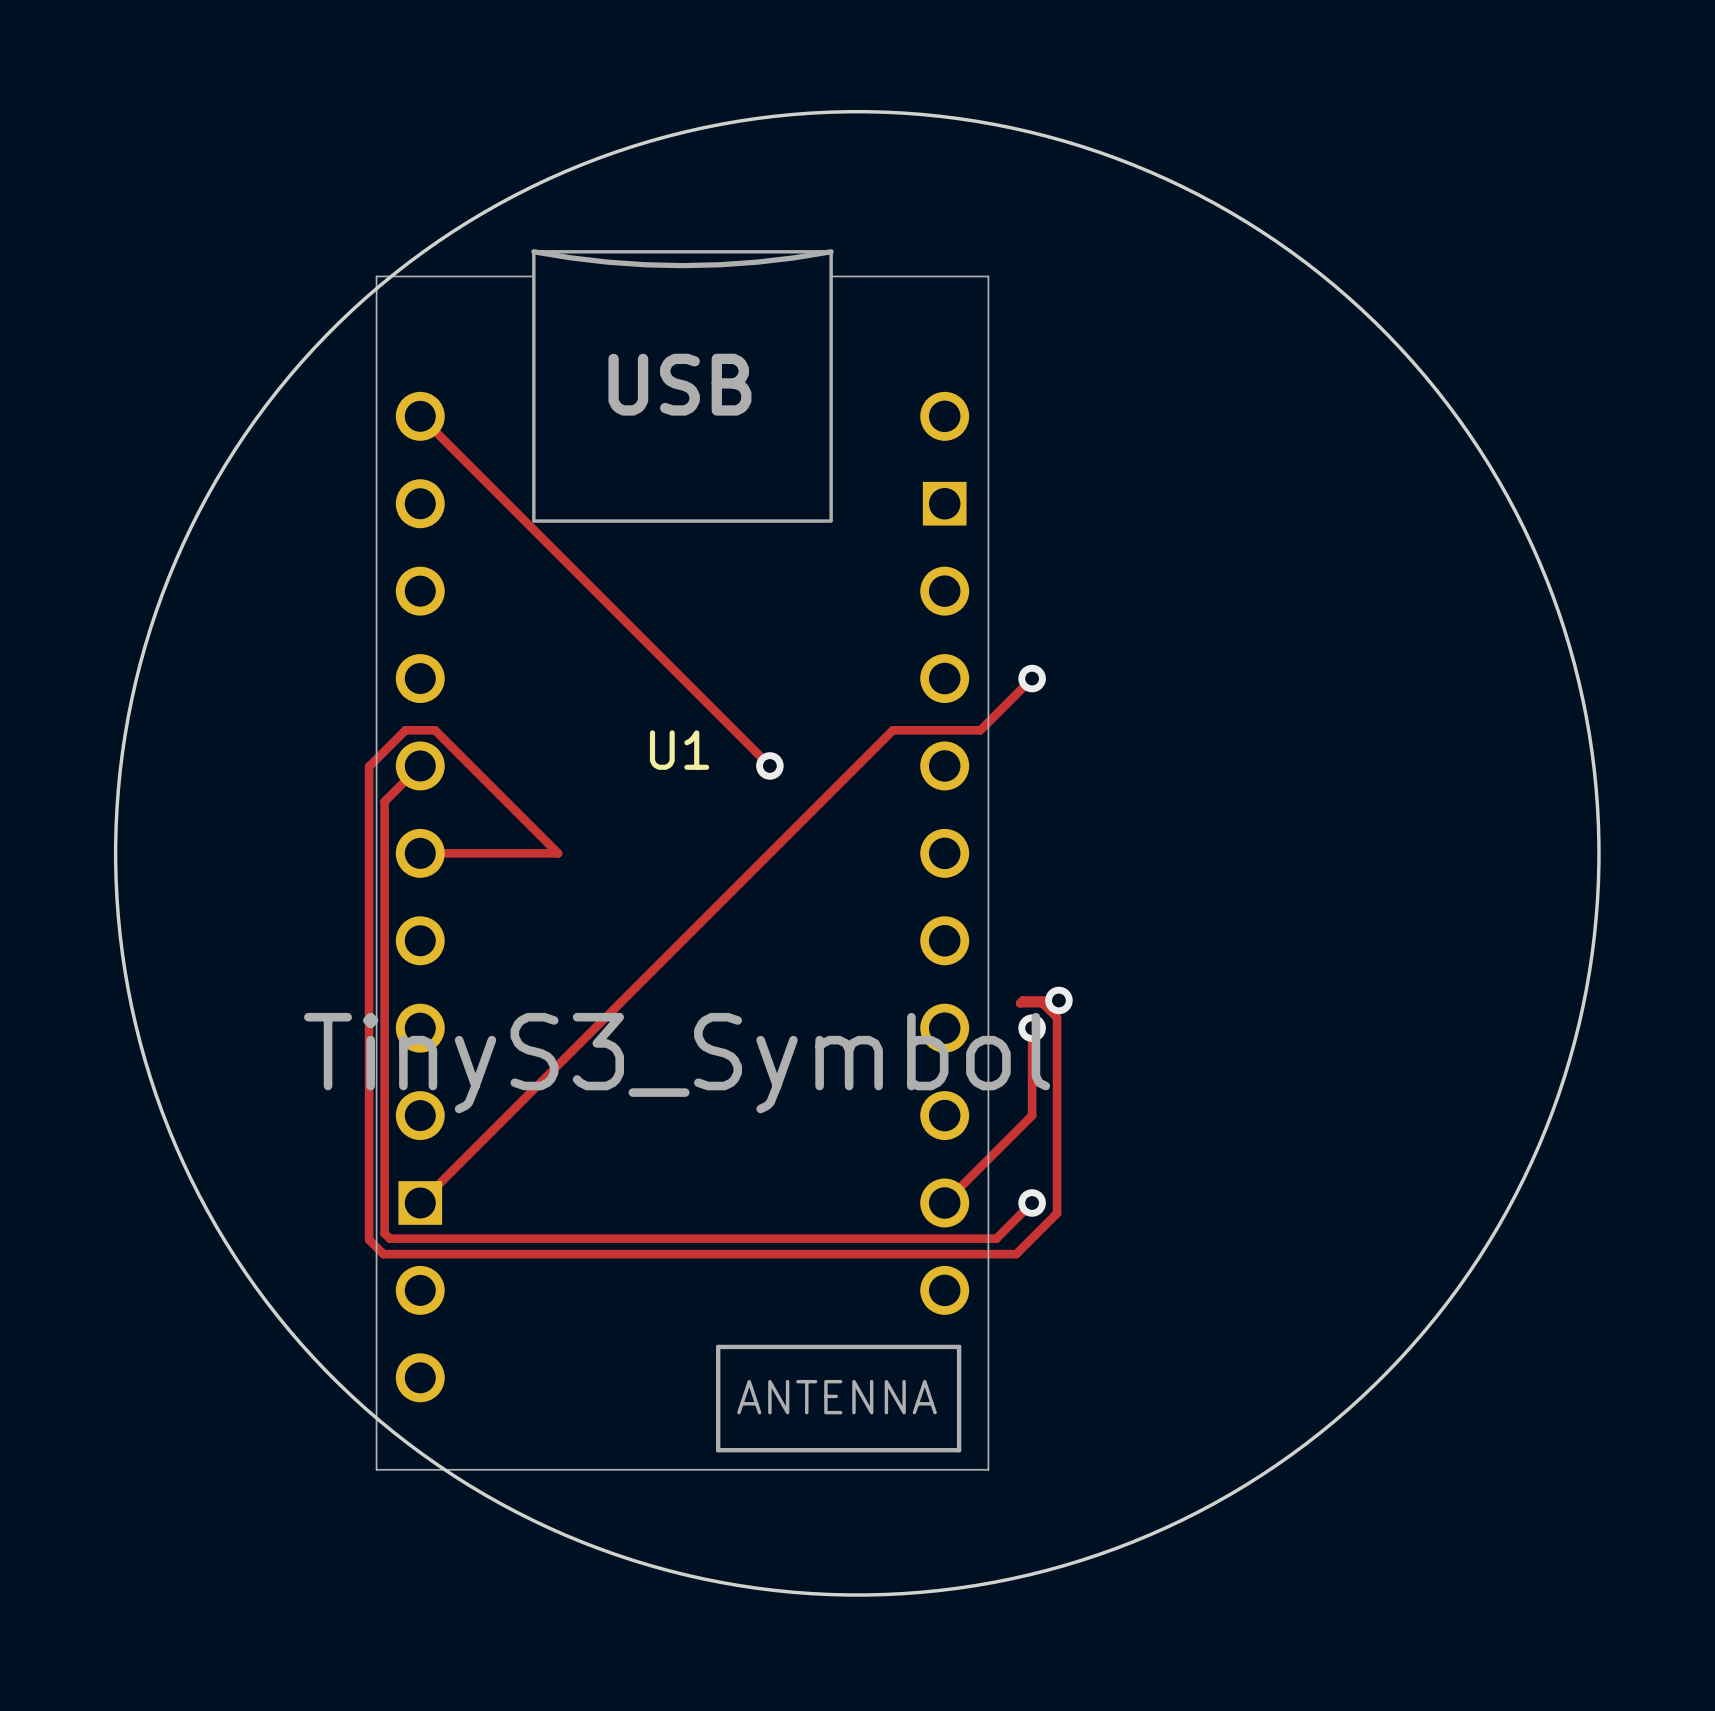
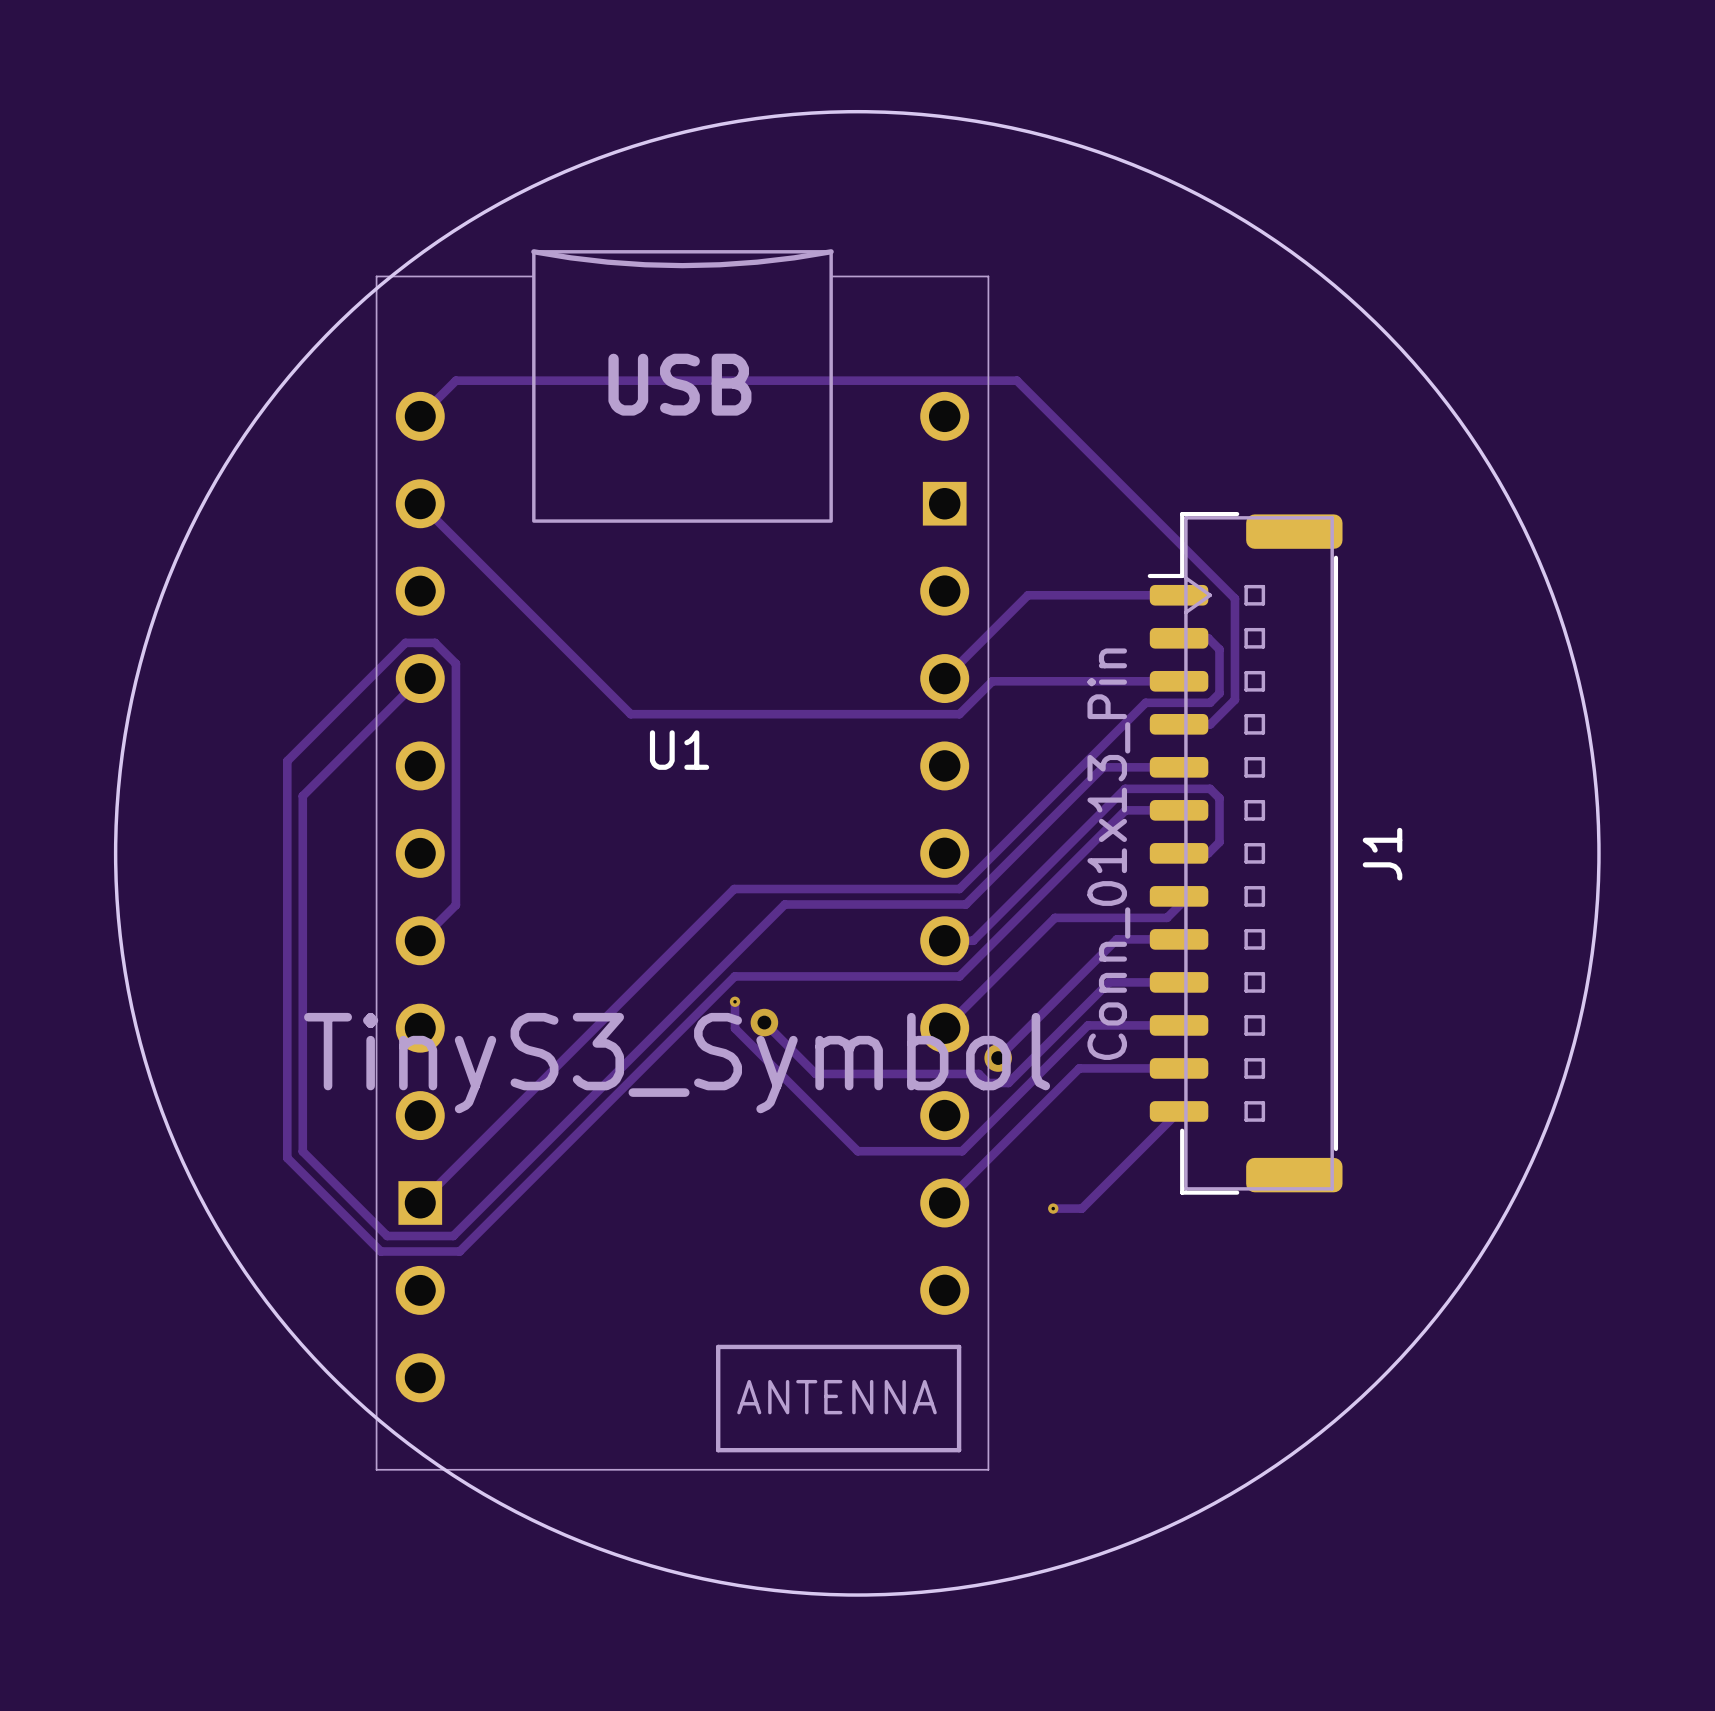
track: (420, 416) (769, 765) -> (420, 416) (455, 380) (1016, 380) (1234, 598) (1234, 699) (1210, 724) (1179, 724)
track: none -> (420, 503) (630, 714) (959, 714) (992, 681) (1179, 681)
track: none -> (1179, 595) (1027, 595) (944, 678)
track: (1032, 678) (980, 730) (892, 730) (734, 889) -> (1179, 638) (1208, 638) (1219, 649) (1219, 693) (1210, 702) (1145, 702) (959, 889) (734, 889)
via: (1032, 678) -> none
track: (420, 765) (384, 801) (384, 1233) -> (420, 678) (302, 796) (302, 1151) (384, 1233)
via: (769, 765) -> none
track: (420, 853) (558, 853) (435, 730) (405, 730) (369, 766) (369, 1239) -> (420, 940) (455, 905) (455, 663) (435, 642) (405, 642) (287, 761) (287, 1157) (369, 1239)
track: none -> (1179, 853) (1208, 853) (1219, 842) (1219, 798) (1210, 788) (1125, 788) (973, 940) (944, 940)
J1: none -> Conn_01x13_Pin (1245, 853)
track: none -> (1179, 896) (1188, 896) (1167, 917) (1055, 917) (944, 1028)
track: none -> (1179, 939) (1116, 939) (998, 1058)
track: none -> (1179, 982) (1109, 982) (1008, 1083) (987, 1083) (978, 1073) (815, 1073) (764, 1022)
track: (1058, 1000) (1022, 1000) (1020, 1003) (1042, 1003) (1057, 1017) (1057, 1213) (1016, 1254) (383, 1254) (380, 1251) -> (1179, 810) (1125, 810) (959, 976) (734, 976) (459, 1251) (380, 1251)
via: (1058, 1000) -> none
track: none -> (735, 1001) (735, 1028) (857, 1151) (962, 1151) (1087, 1025) (1179, 1025)
via: none -> (735, 1001)
via: none -> (764, 1022)
track: (1032, 1028) (1032, 1115) -> (1179, 1068) (1079, 1068) (1032, 1115)
via: (1032, 1028) -> none
via: none -> (998, 1058)
track: none -> (1179, 1111) (1081, 1208) (1053, 1208)
track: (1032, 1202) (996, 1238) (389, 1238) (387, 1236) -> (1179, 767) (1103, 767) (965, 904) (784, 904) (453, 1236) (387, 1236)
via: (1032, 1202) -> none
via: none -> (1053, 1208)

